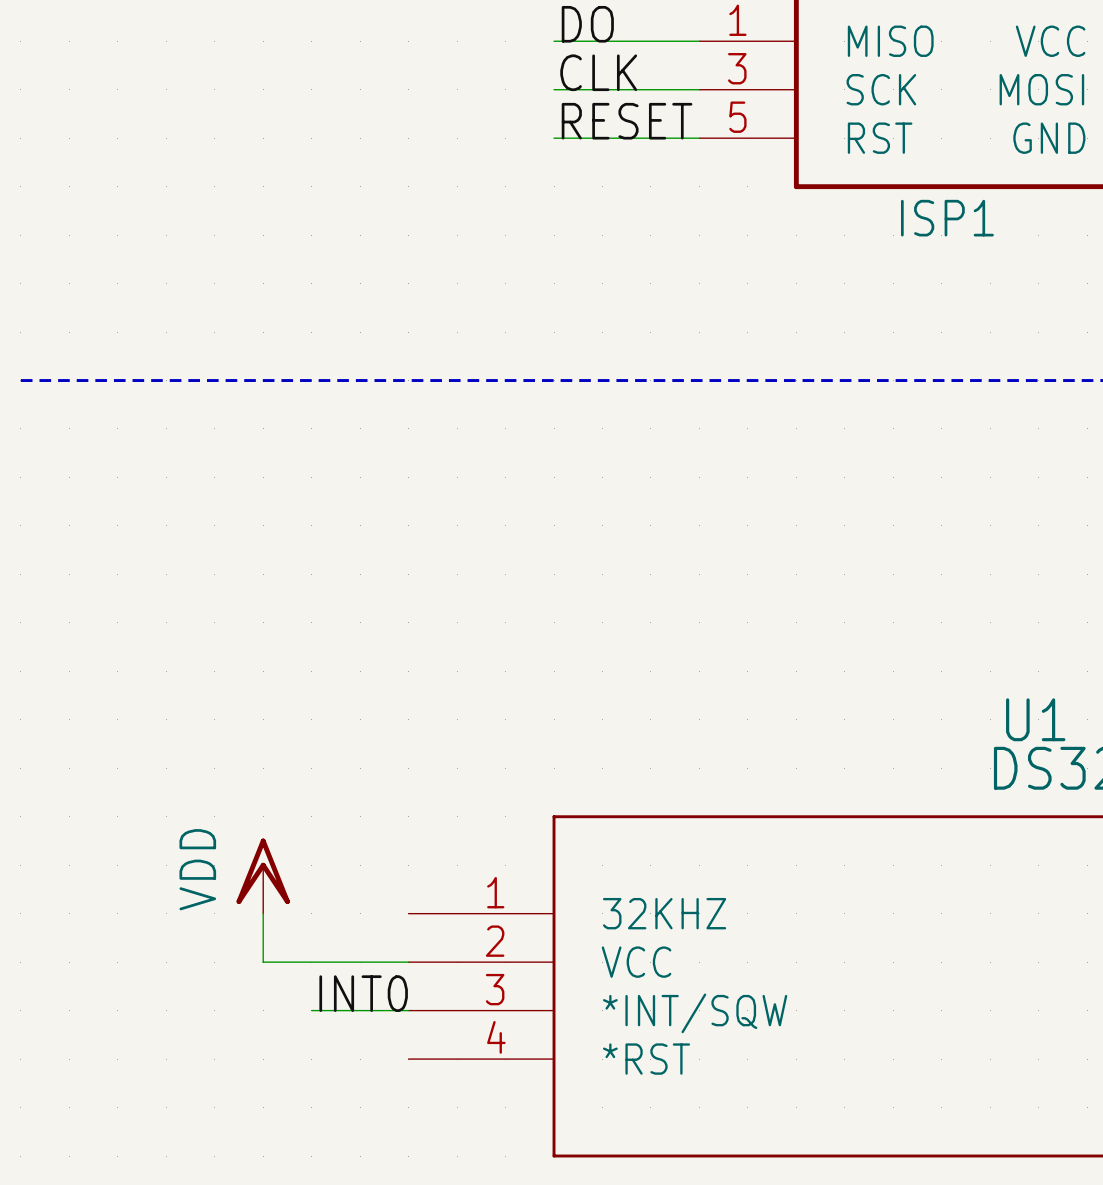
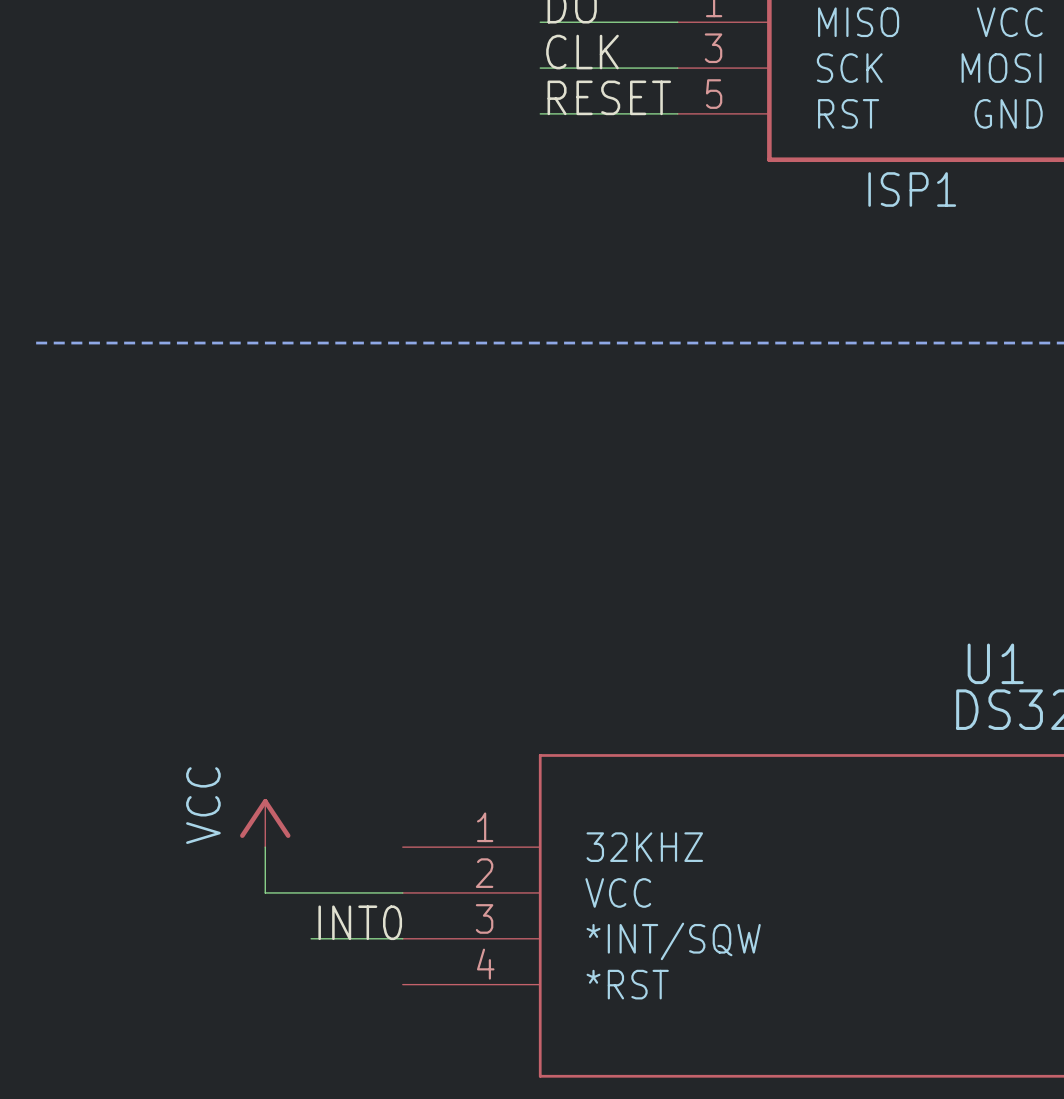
power symbol: VDD (263, 876) -> VCC (265, 823)

